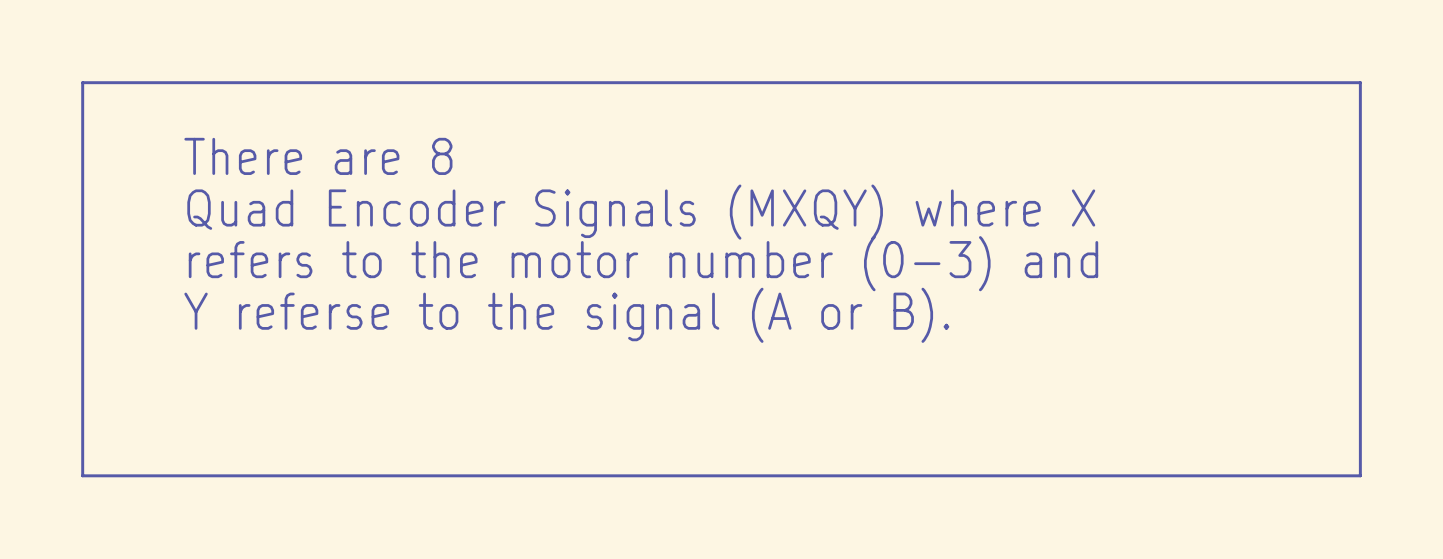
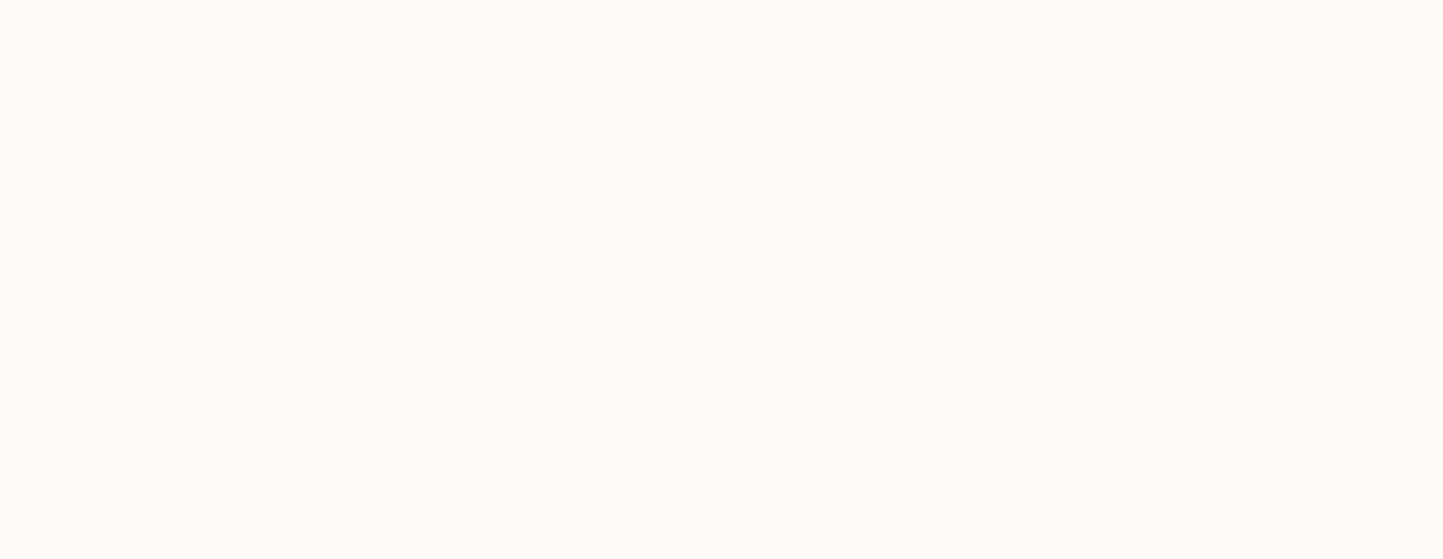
line: (82, 82) (1360, 82) (1360, 475) (82, 475) (82, 82) -> none
text: There are 8 (318, 156) -> none
text: Quad Encoder Signals (MXQY) where X (641, 212) -> none
text: refers to the motor number (0-3) and (643, 263) -> none
text: Y referse to the signal (A or B). (566, 315) -> none

